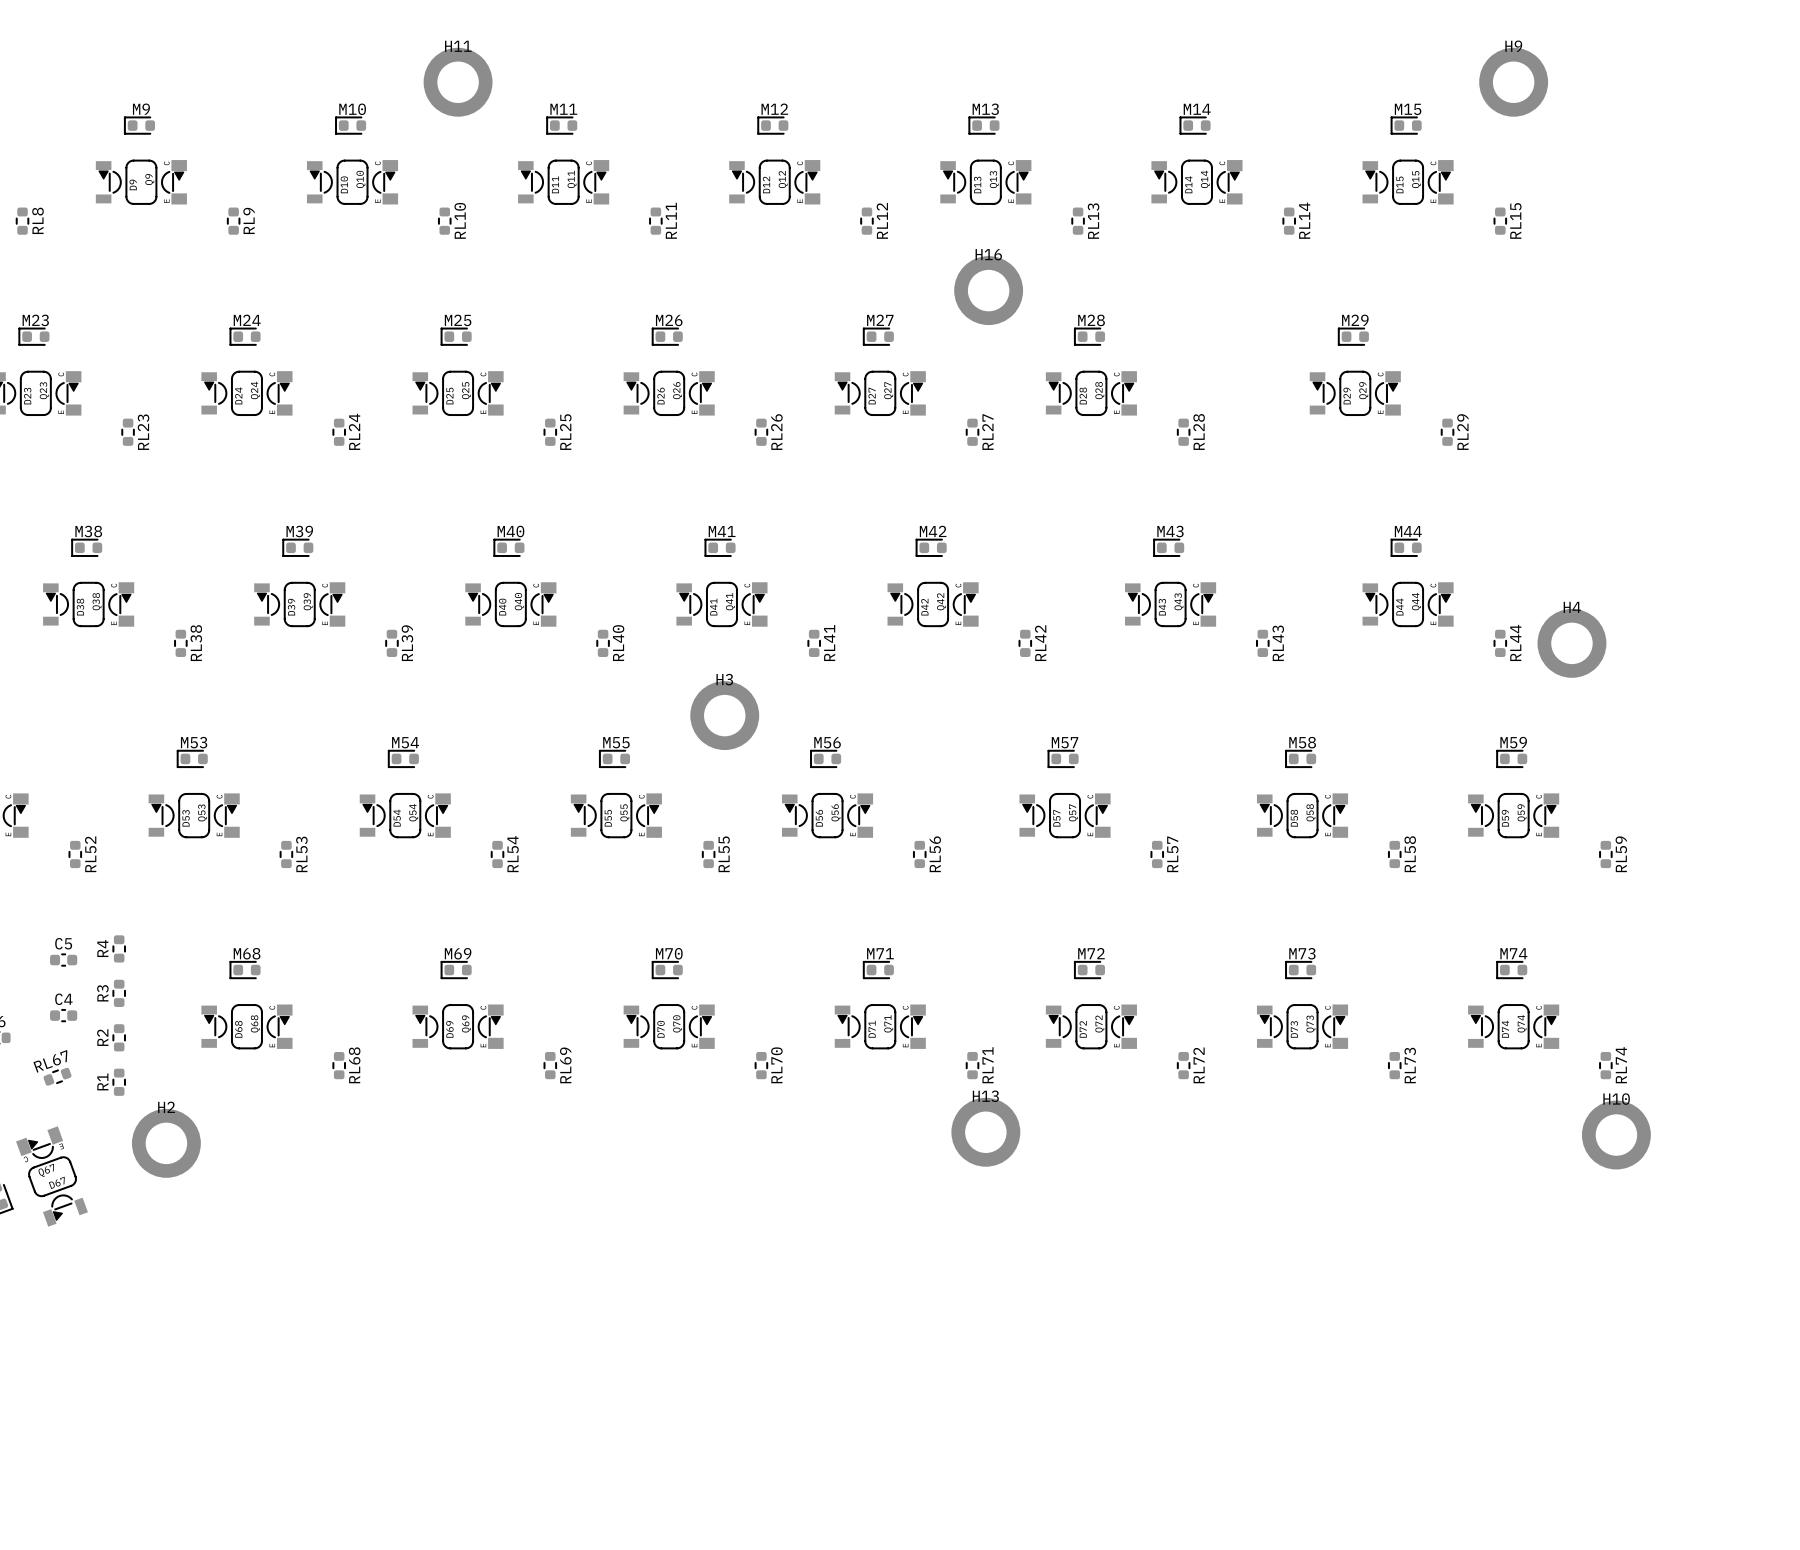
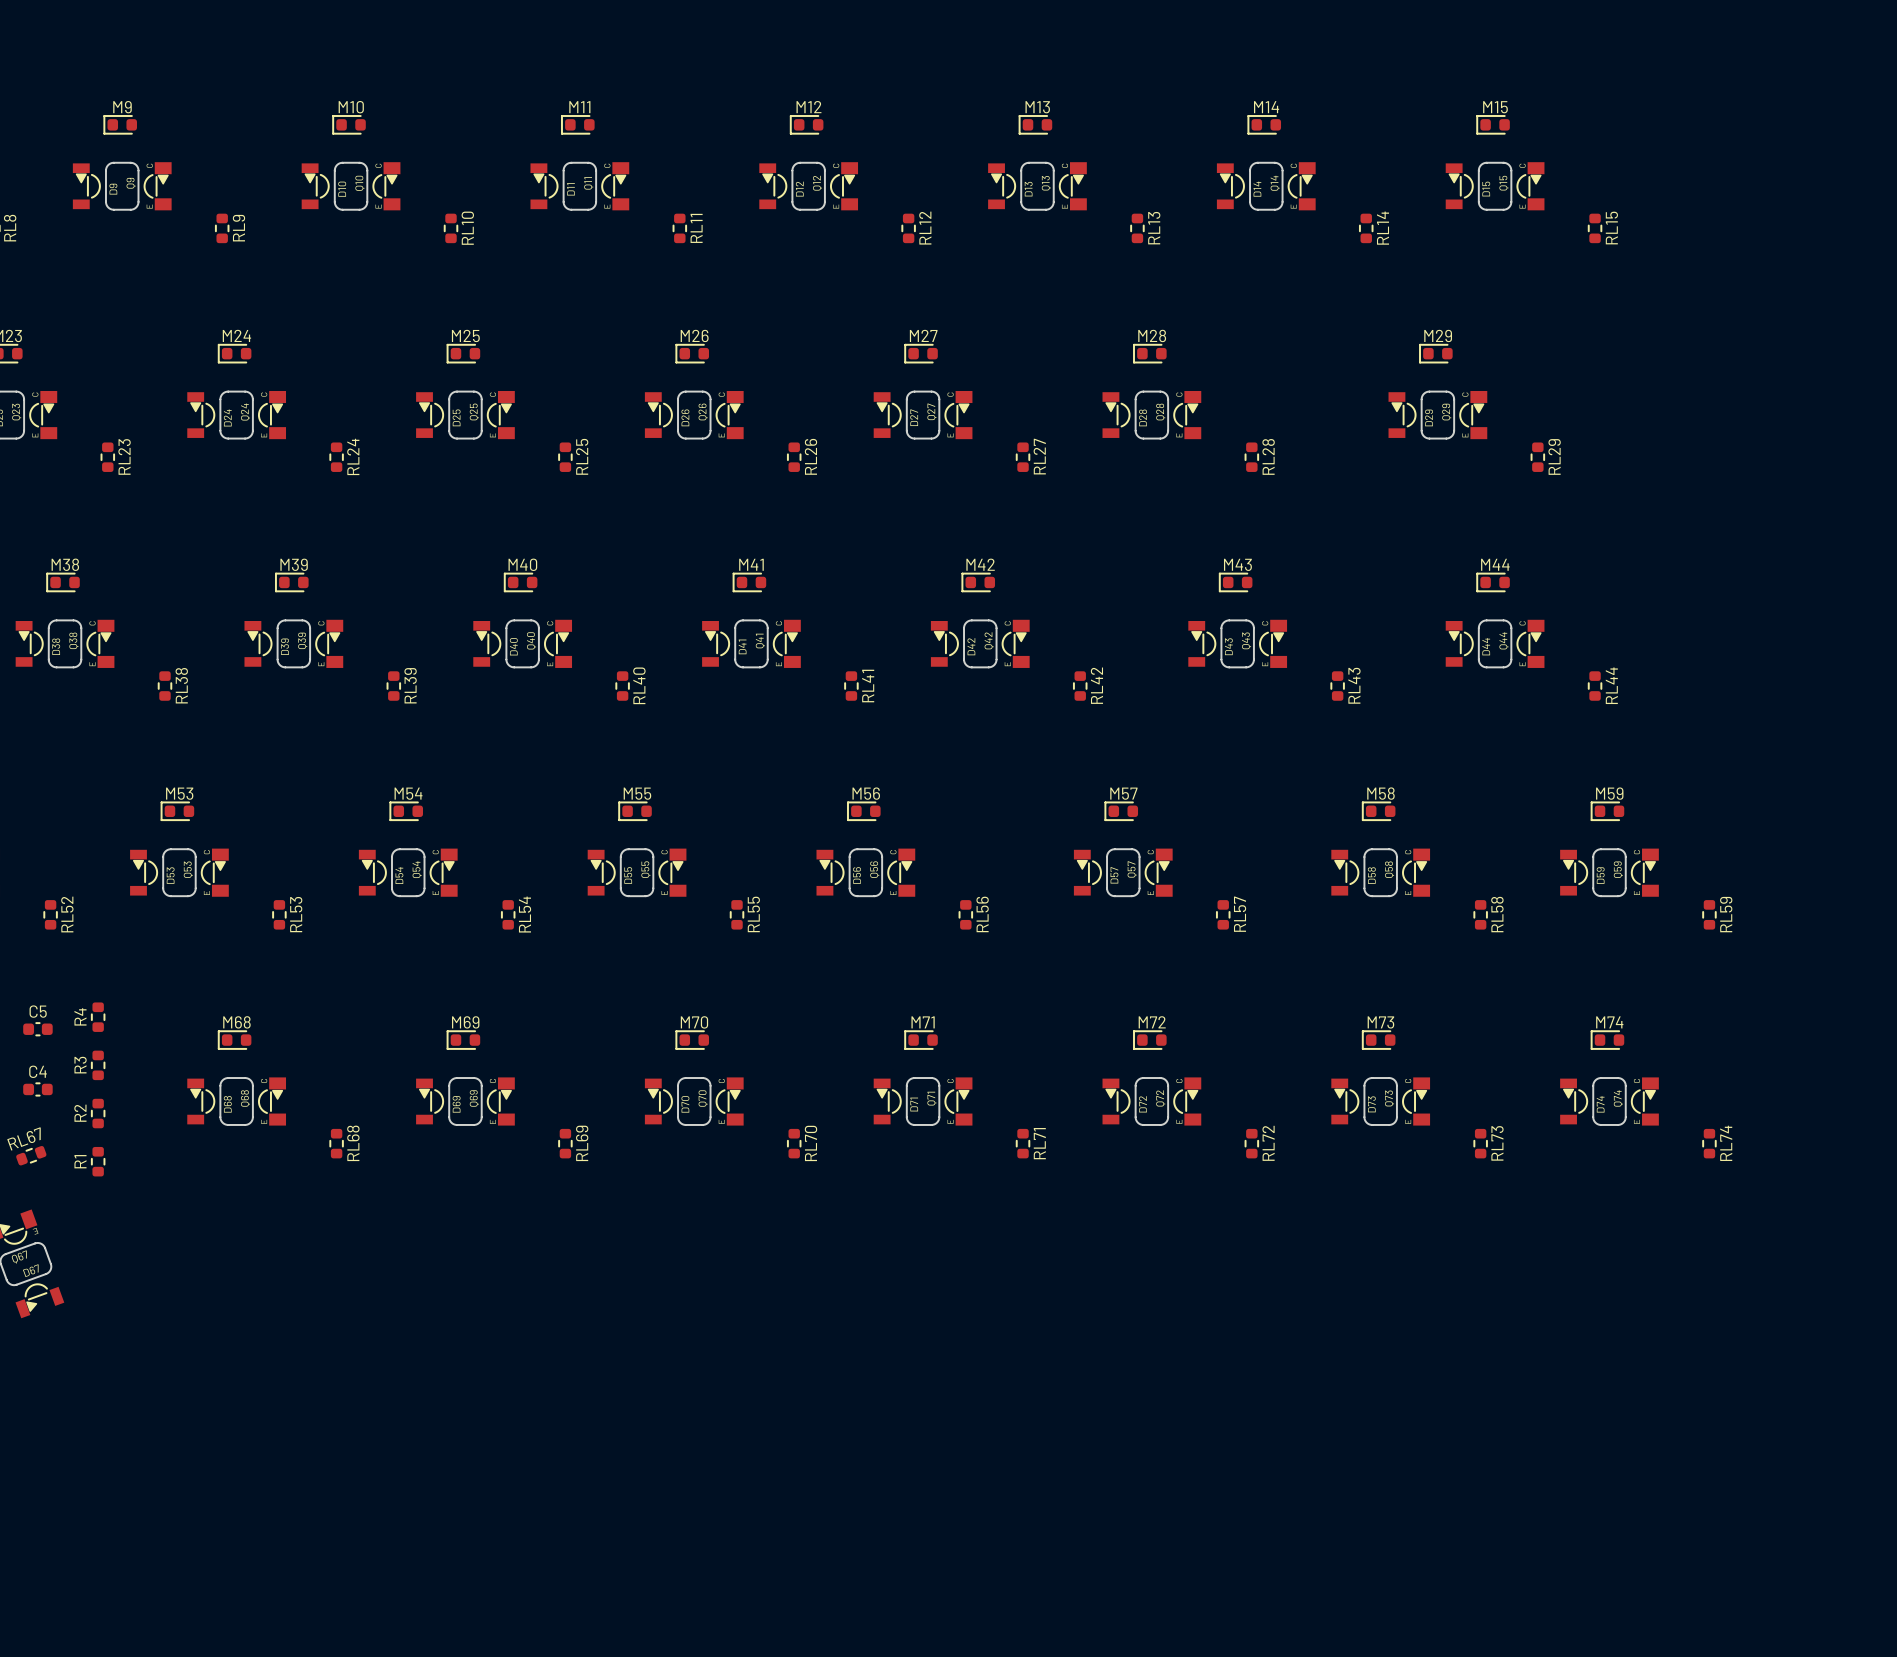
H11: (458, 82) -> none
H9: (1513, 82) -> none
H16: (988, 290) -> none
H4: (1571, 643) -> none
H3: (724, 715) -> none
H13: (985, 1132) -> none
H10: (1616, 1135) -> none
H2: (166, 1143) -> none

